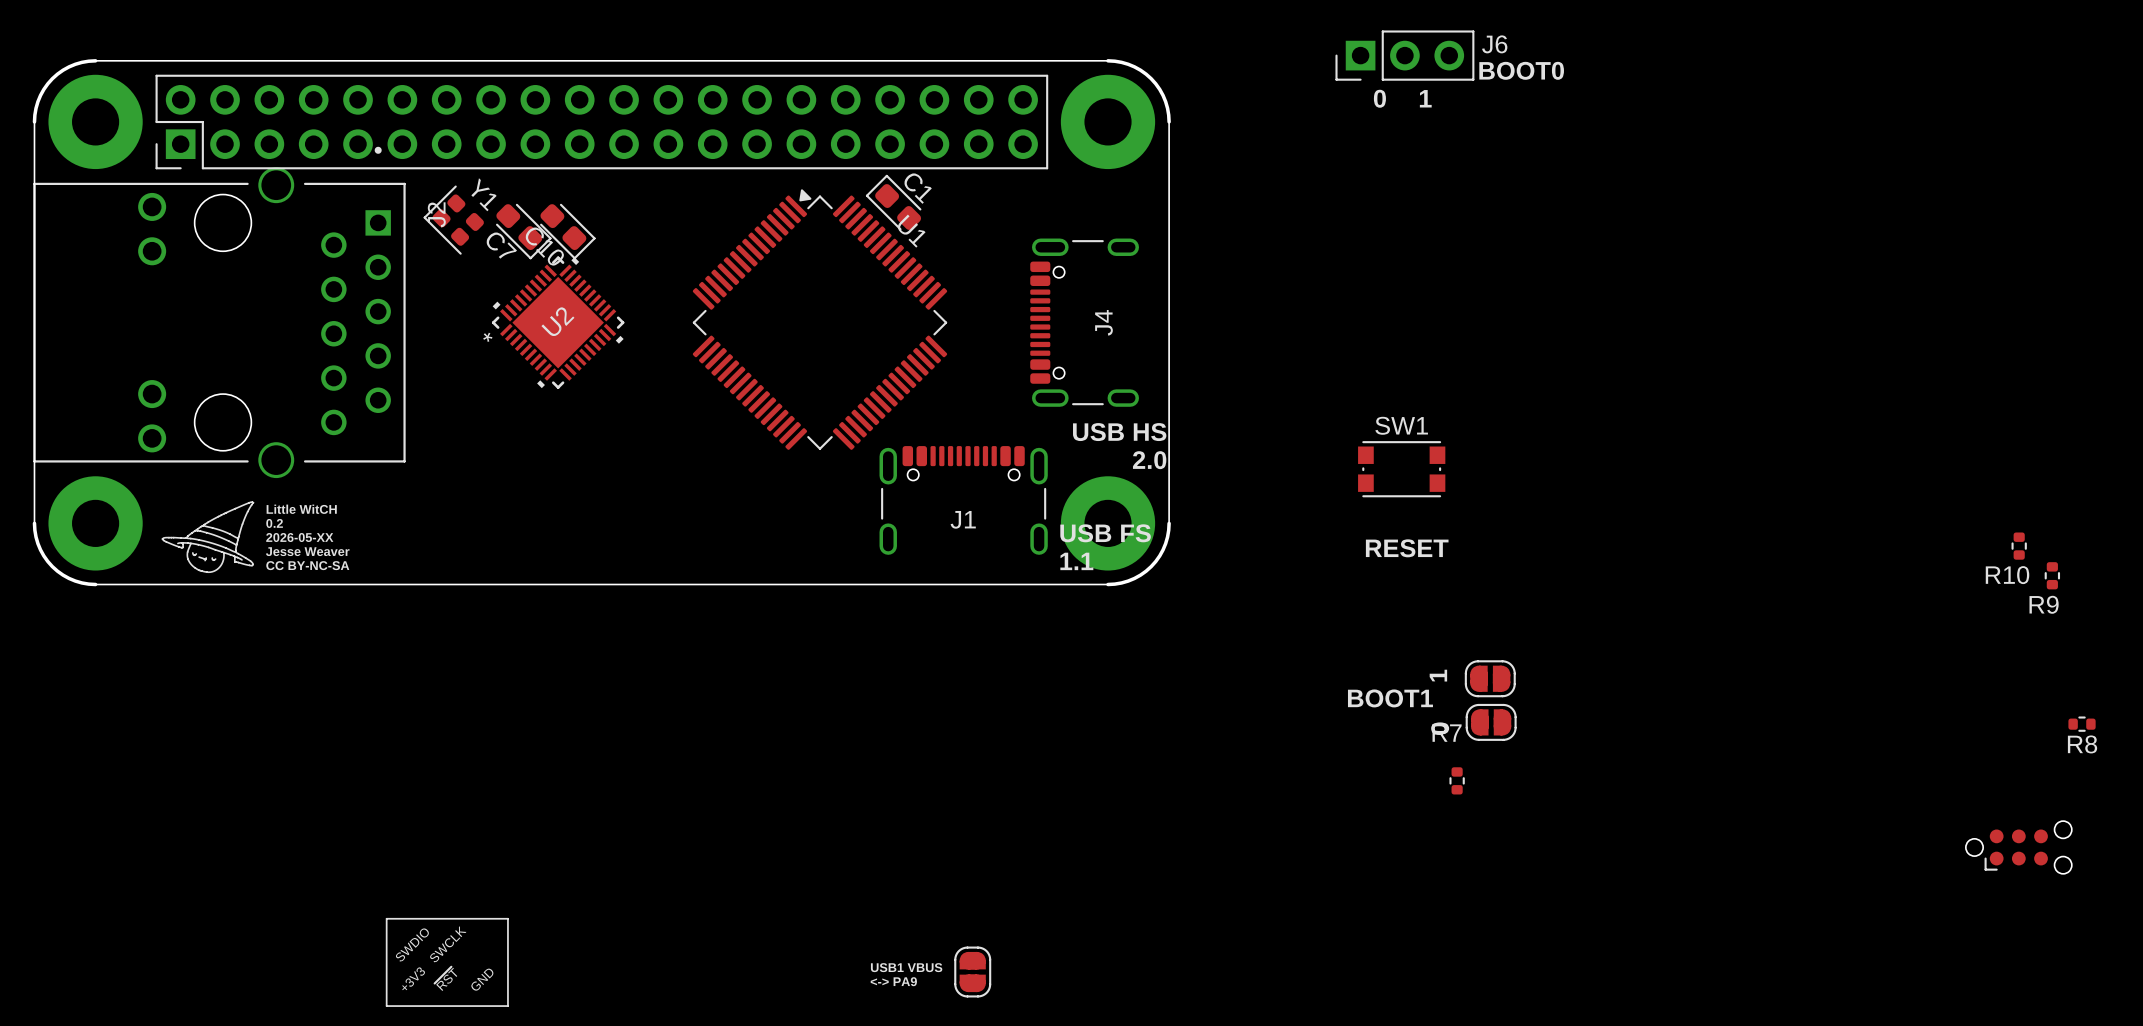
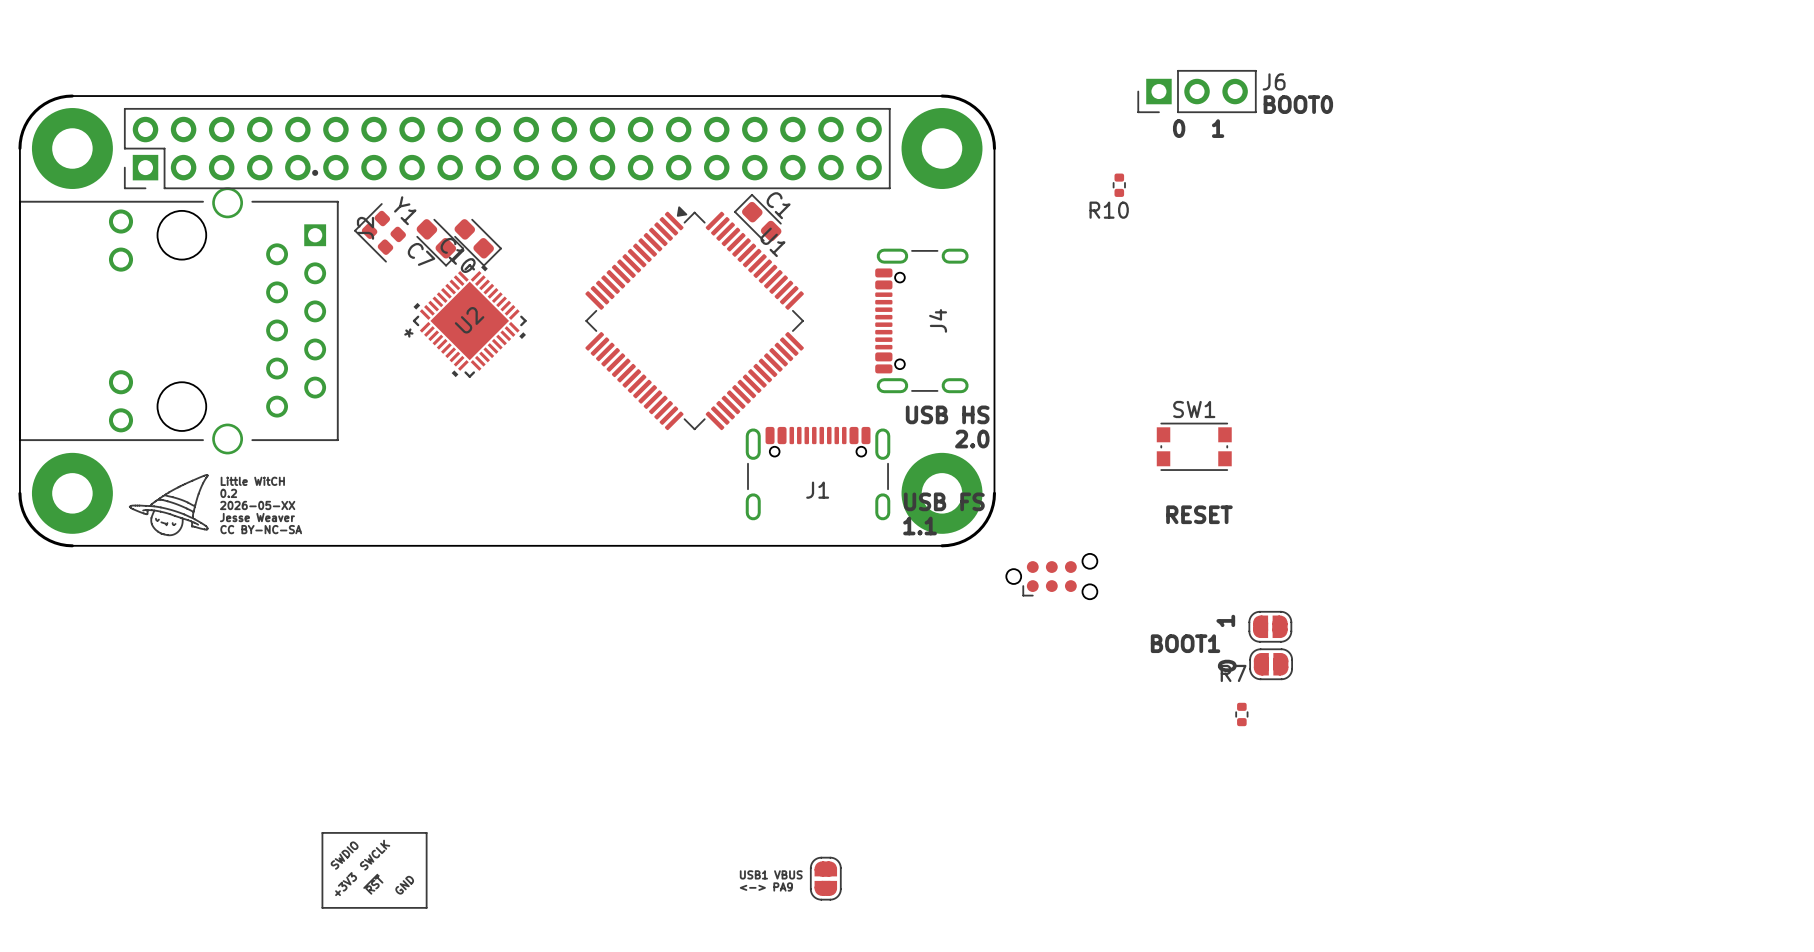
R10 position: (2019, 546) -> (1119, 185)
R9: (2052, 575) -> none
part: none -> (1051, 576)
R8: (2082, 724) -> none
part: (2018, 847) -> none

